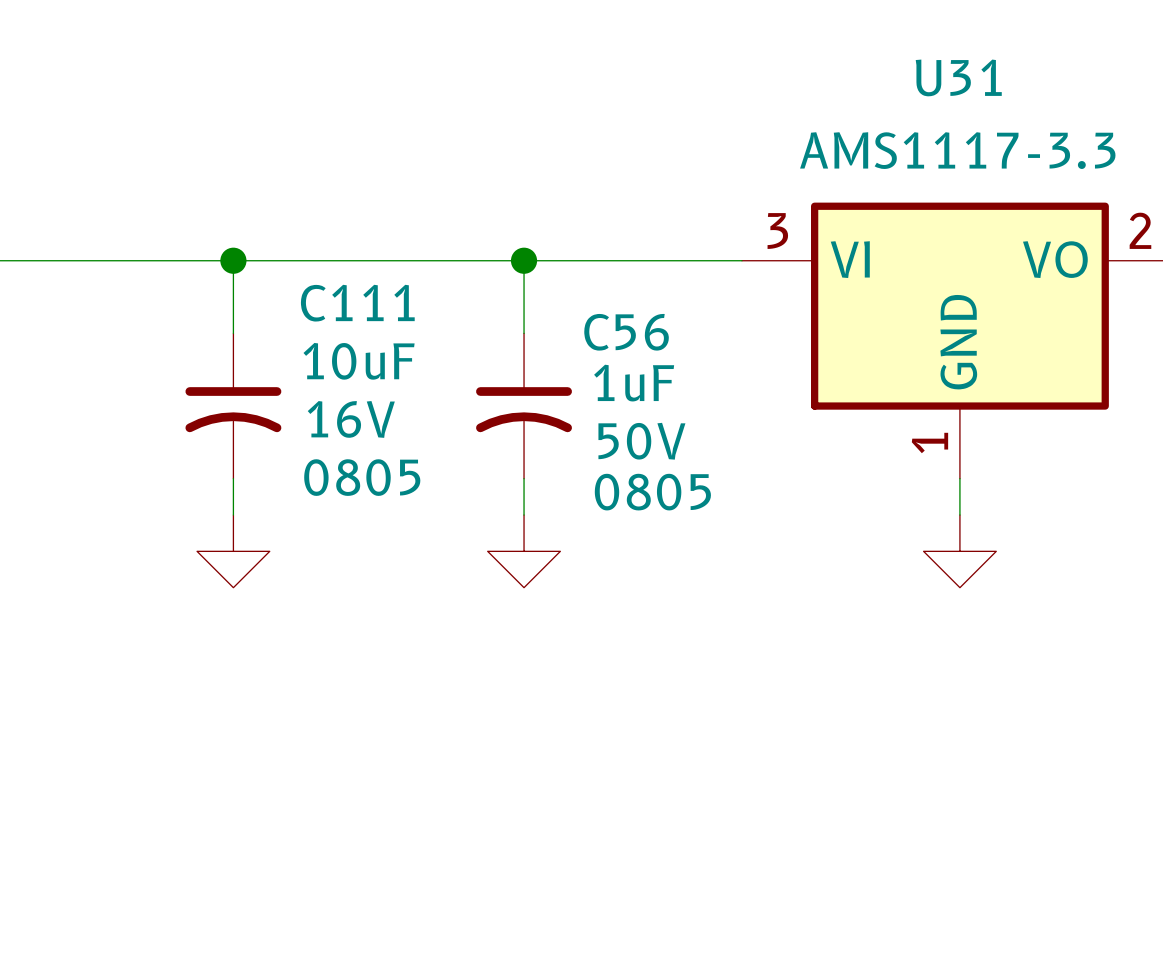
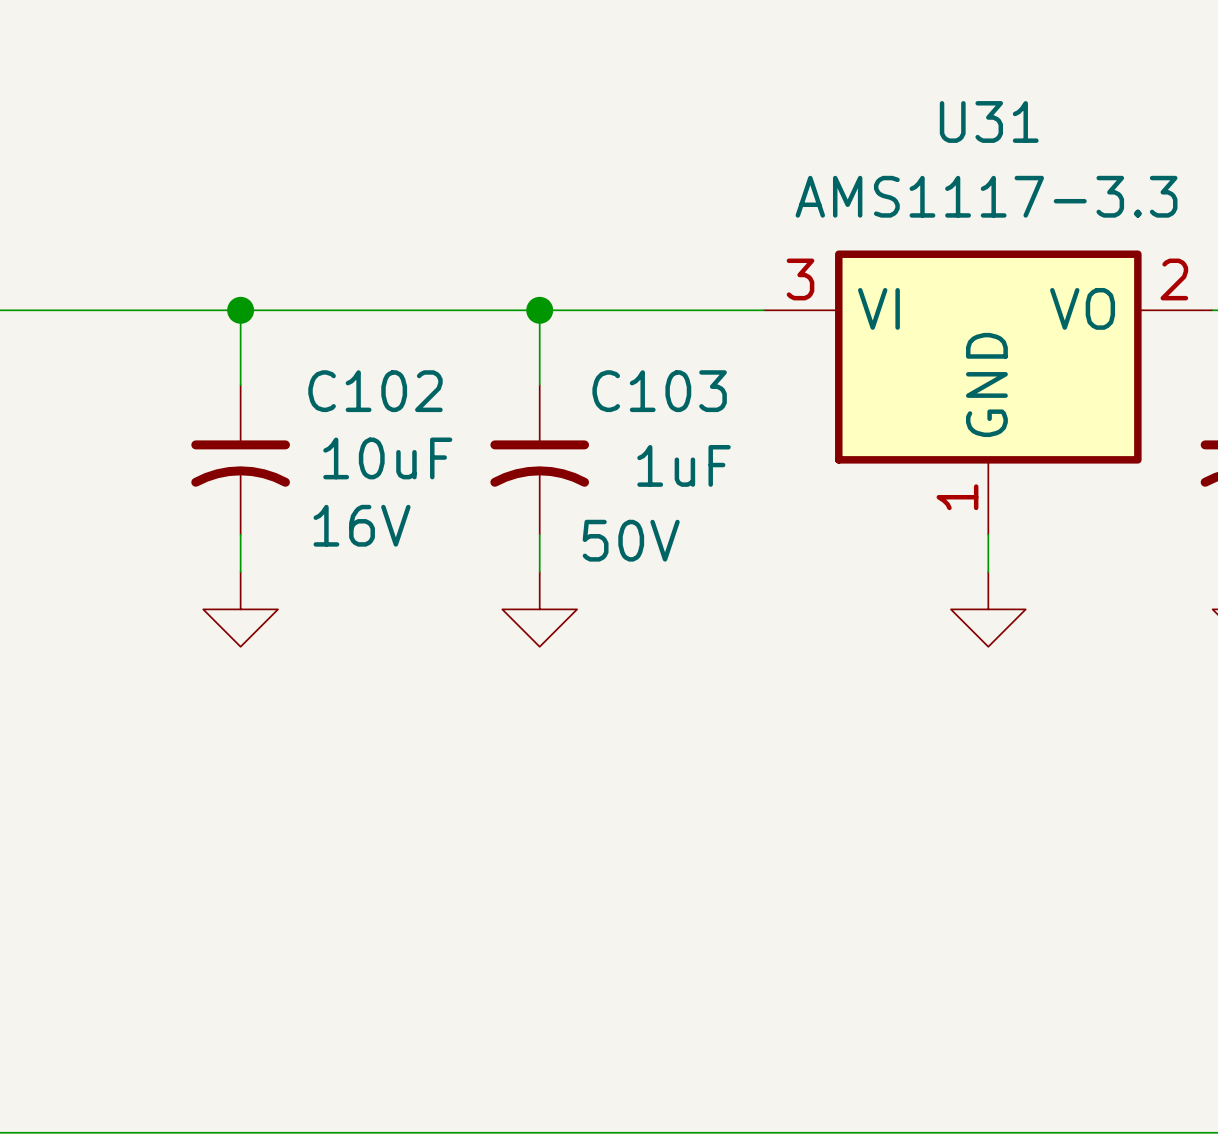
C111 name: C111 (357, 303) -> C102 (375, 391)
C56 name: C56 (626, 332) -> C103 (659, 391)
C111 value position: 10uF (359, 361) -> 10uF (387, 458)
C56 value position: 1uF (634, 383) -> 1uF (684, 465)
C111 text position: 16V (351, 419) -> 16V (362, 525)
C56 text position: 50V (641, 441) -> 50V (631, 540)
C111 text: 0805 (362, 477) -> none
C56 text: 0805 (652, 492) -> none

